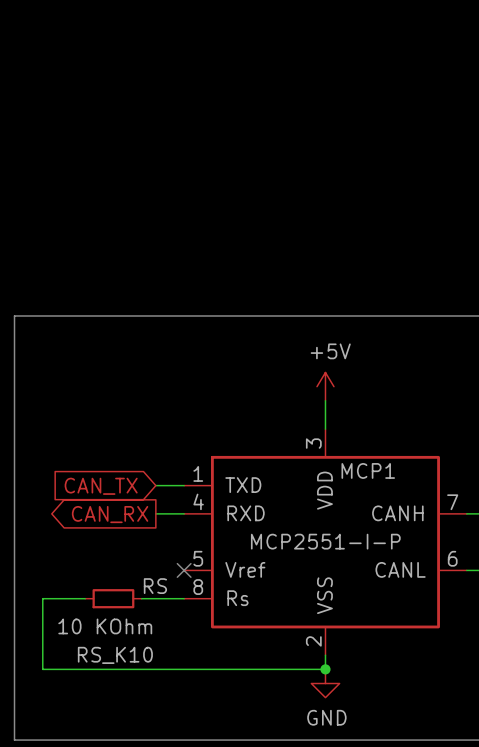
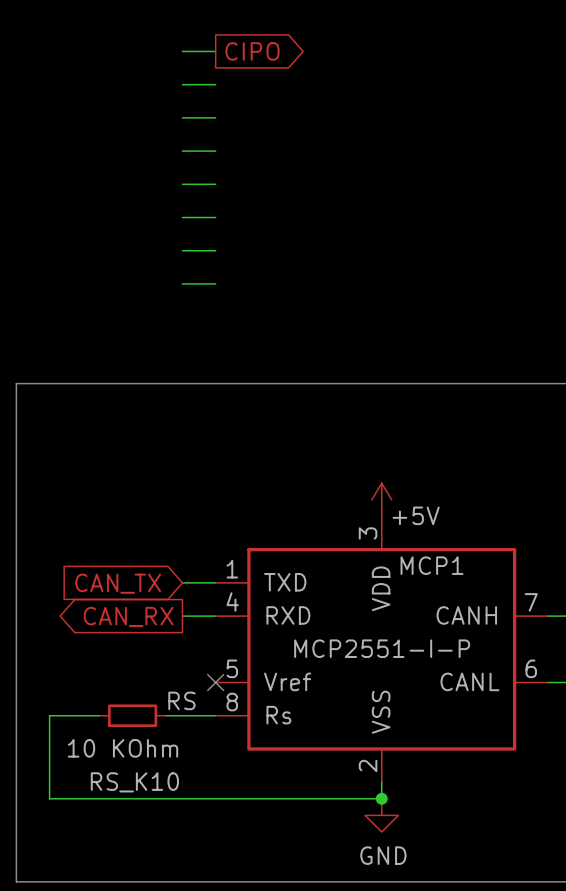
wire: none -> (182, 51) (215, 51)
global label: none -> CIPO (252, 51)
wire: none -> (182, 84) (215, 84)
wire: none -> (182, 117) (215, 117)
wire: none -> (182, 151) (215, 151)
wire: none -> (182, 184) (215, 184)
wire: none -> (182, 217) (215, 217)
wire: none -> (182, 250) (215, 250)
wire: none -> (182, 283) (215, 283)
power symbol text position: +5V (330, 351) -> +5V (416, 515)
power symbol position: +5V (325, 386) -> +5V (381, 499)

